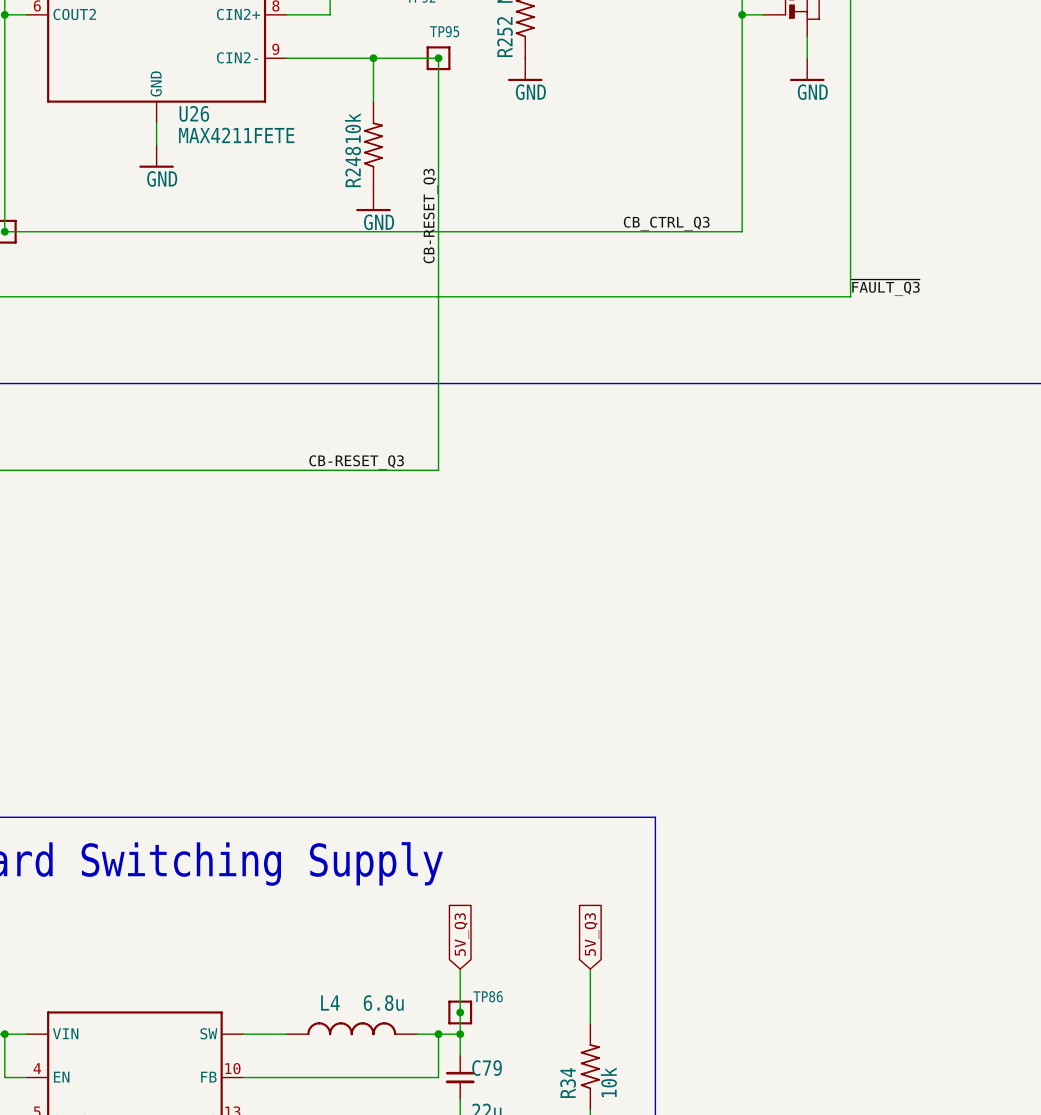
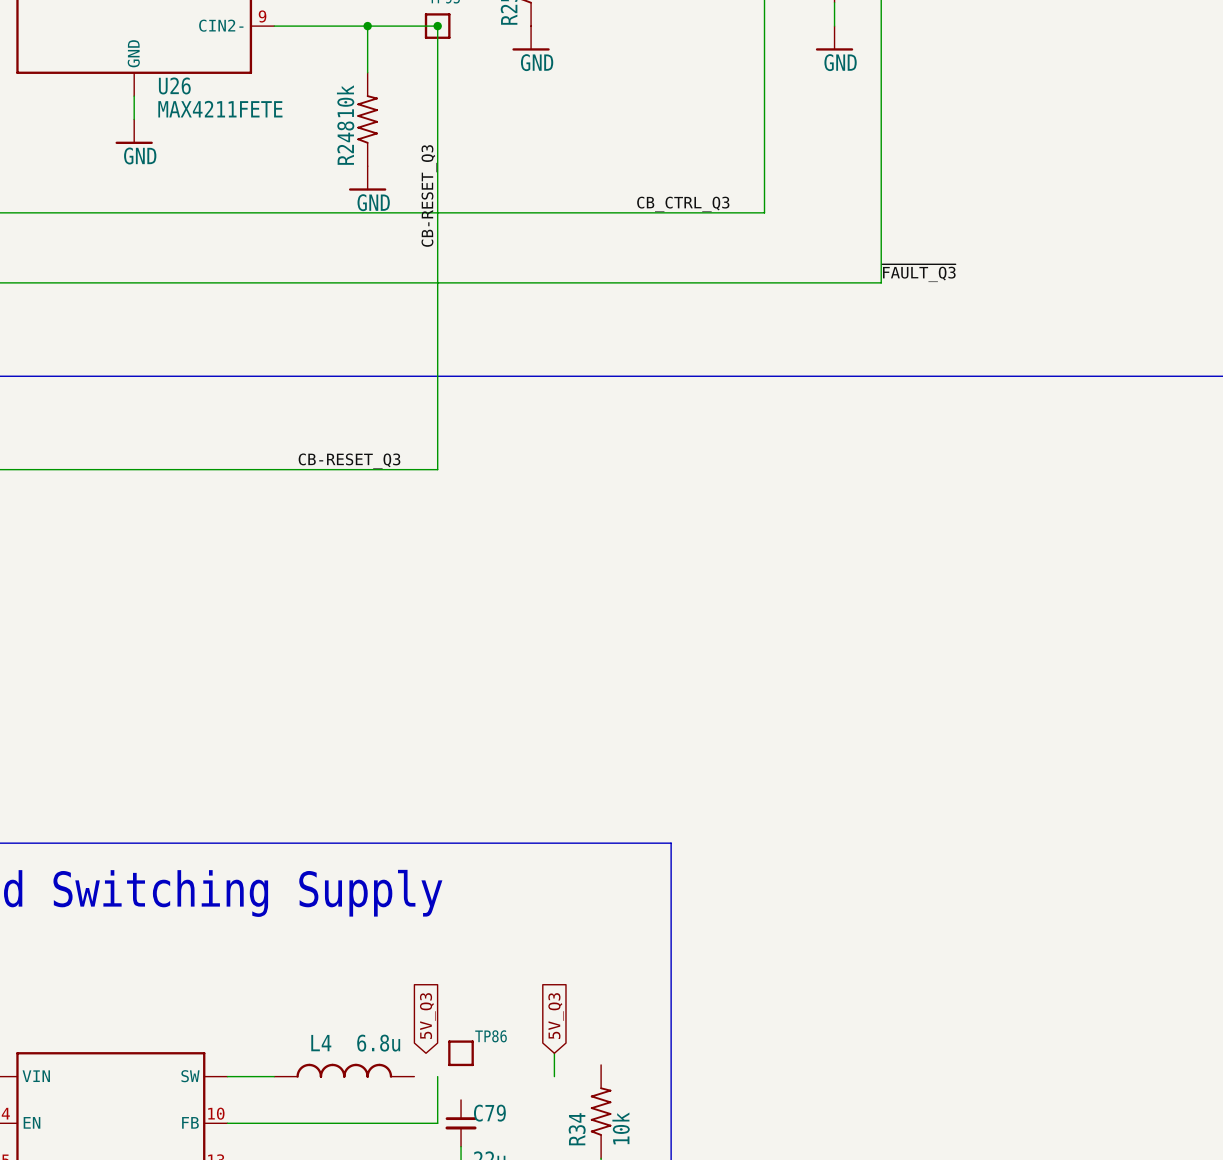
global label: 5V_Q3 (461, 934) -> none
global label: 5V_Q3 (591, 934) -> none
wire: (460, 969) (460, 1055) -> none
wire: (590, 969) (590, 1023) -> none
global label: none -> 5V_Q3 (427, 1016)
global label: none -> 5V_Q3 (556, 1016)
junction: (460, 1012) -> none
wire: none -> (554, 1053) (554, 1076)
wire: (416, 1034) (460, 1034) -> none
junction: (438, 1034) -> none
junction: (460, 1034) -> none

